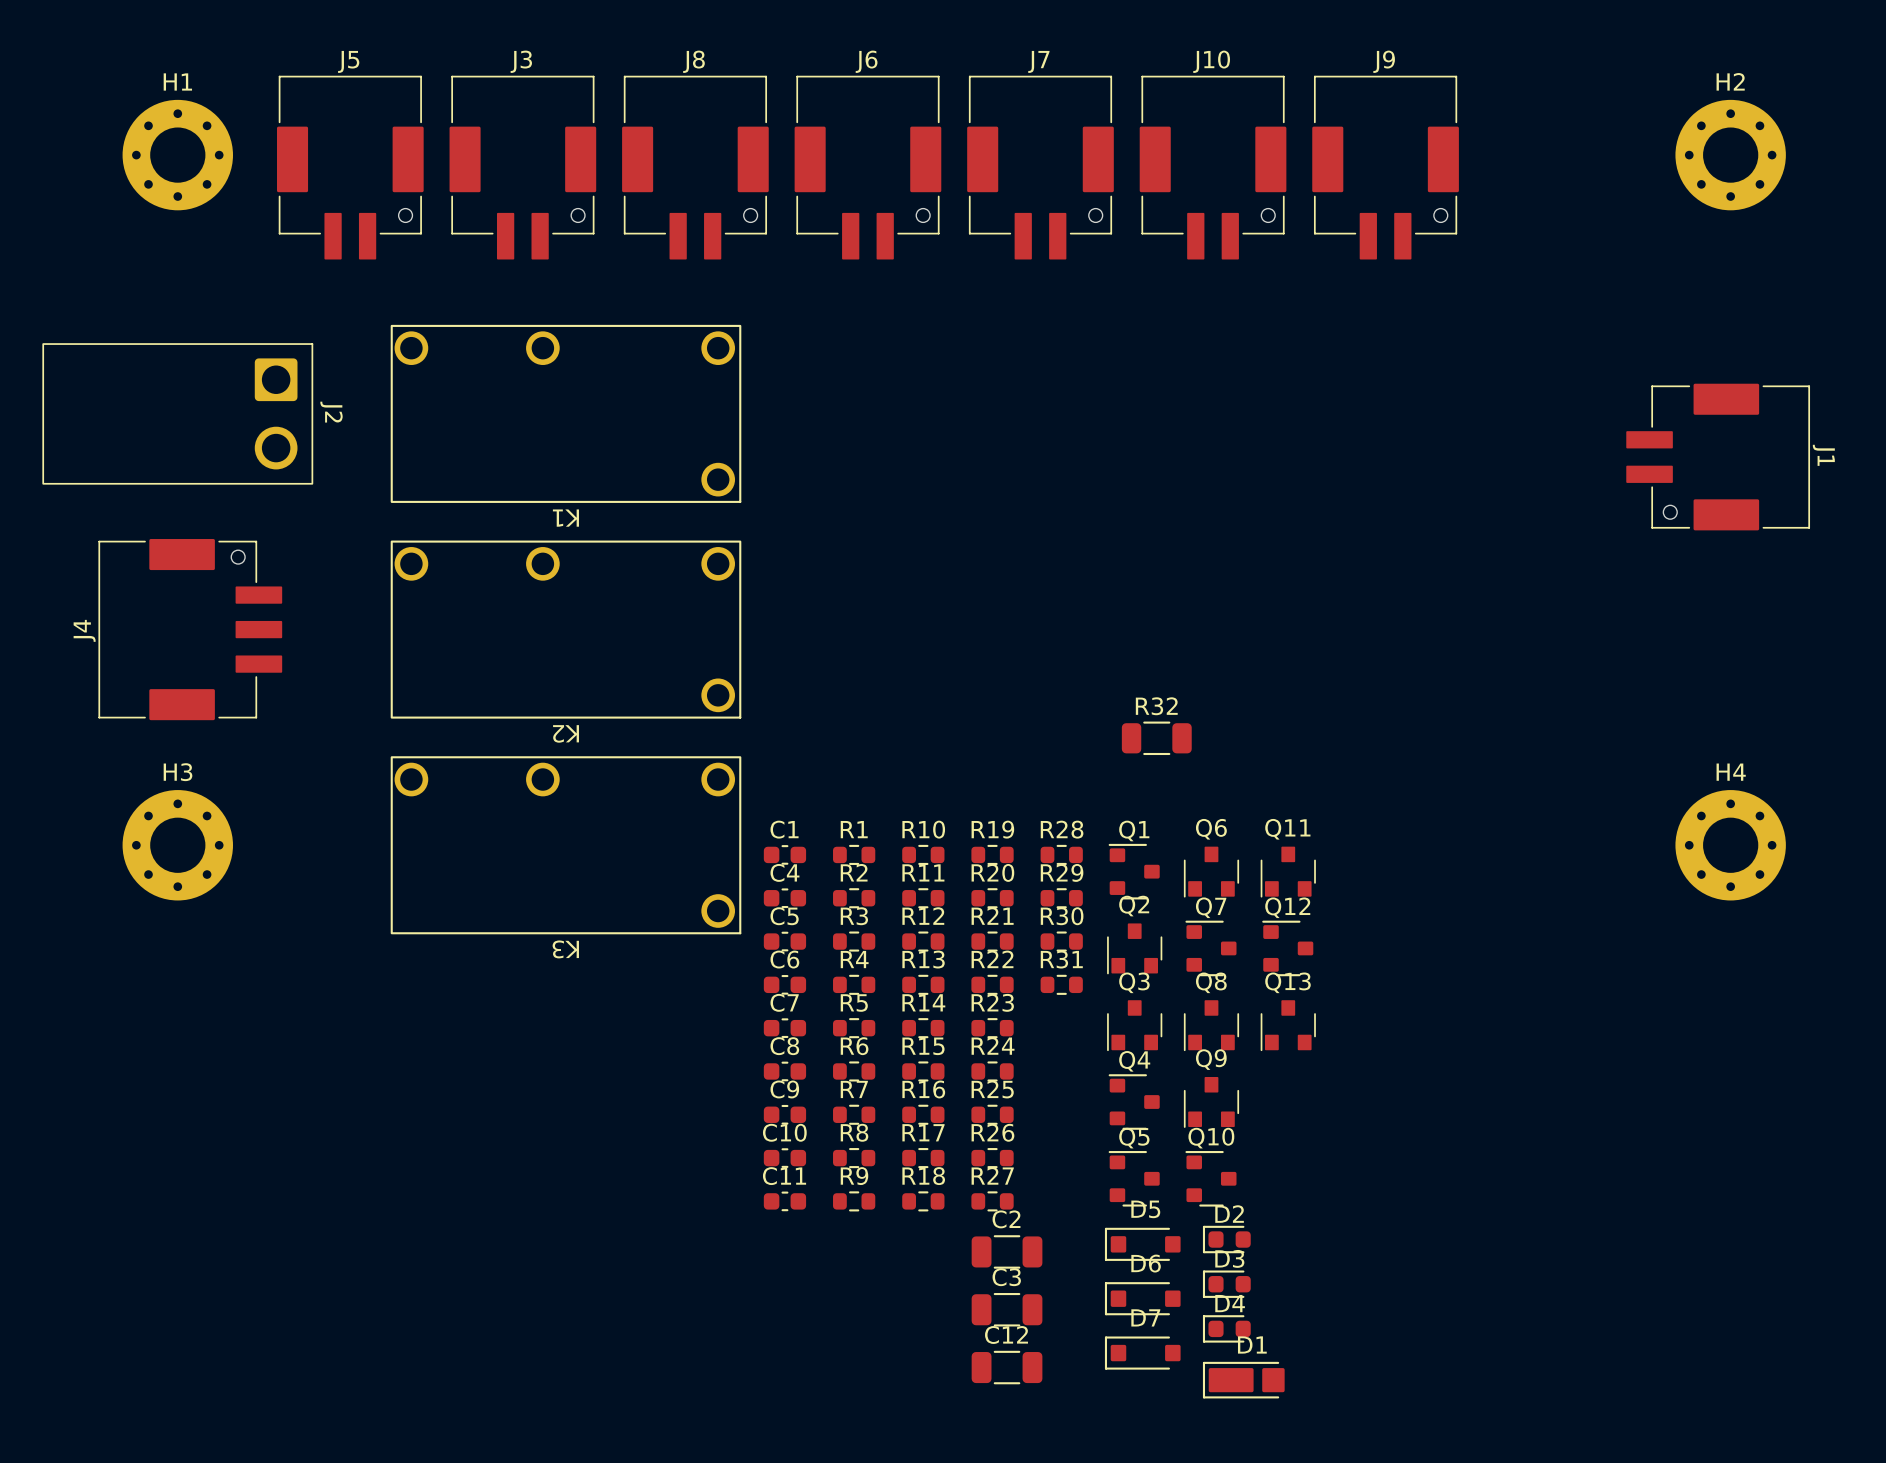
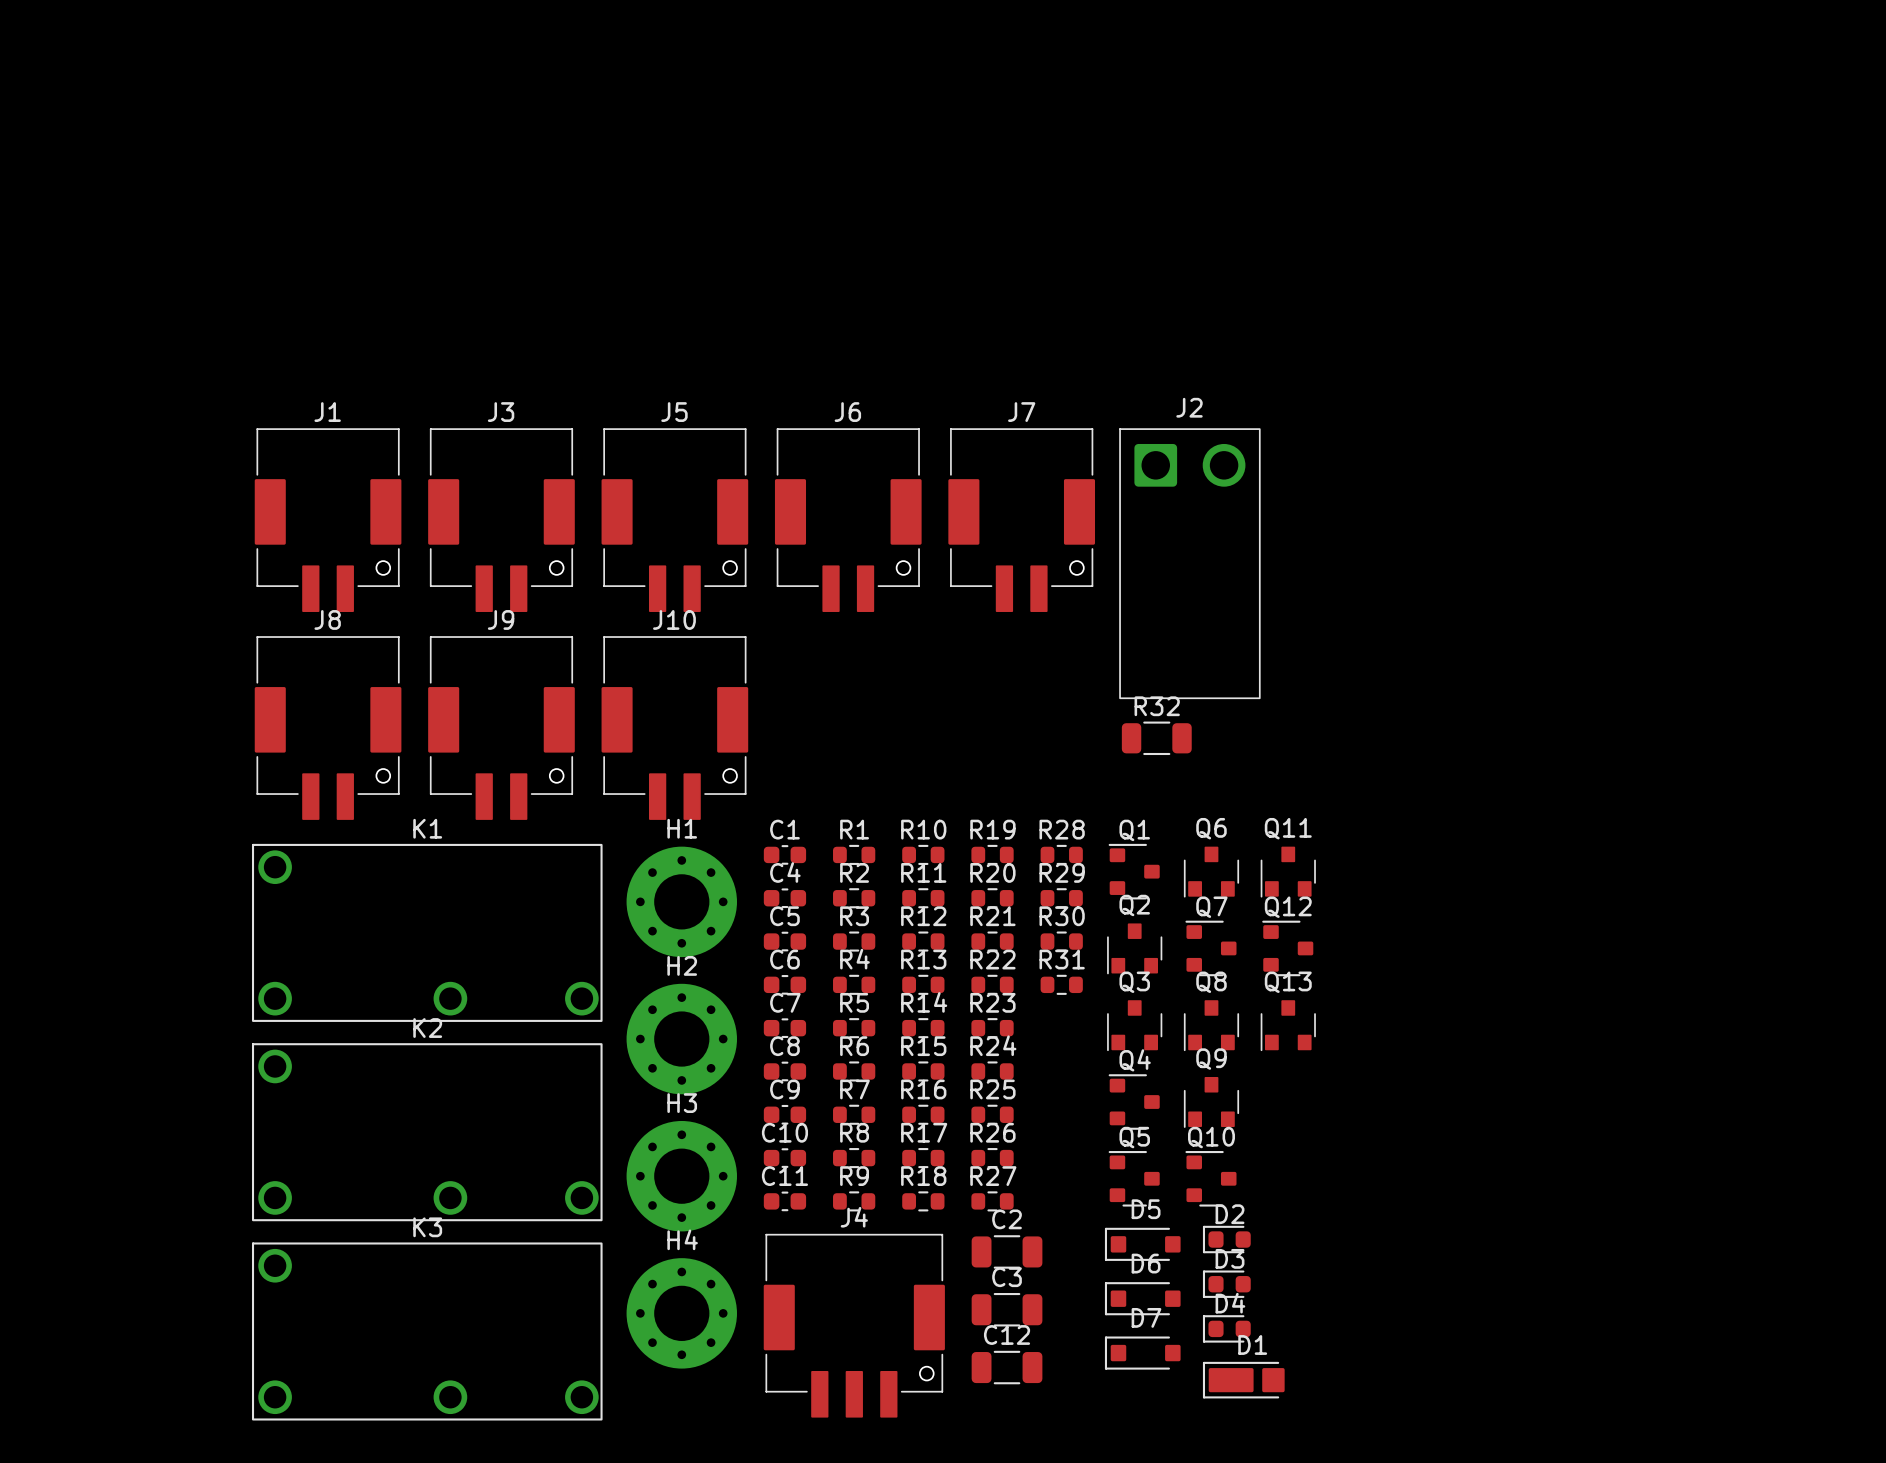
H1 position: (177, 155) -> (681, 901)
H2 position: (1730, 155) -> (681, 1039)
J5 position: (350, 167) -> (674, 520)
J3 position: (522, 167) -> (501, 520)
J8 position: (695, 167) -> (328, 728)
J6 position: (867, 167) -> (848, 520)
J7 position: (1040, 167) -> (1021, 520)
J10 position: (1213, 167) -> (674, 728)
J9 position: (1385, 167) -> (501, 728)
J2 rotation: 0° (177, 413) -> 90° counterclockwise (1189, 563)
J2 position: (177, 413) -> (1189, 563)
K1 rotation: 0° (566, 413) -> 180° (427, 932)
K1 position: (566, 413) -> (427, 932)
J1 rotation: 0° (1718, 457) -> 90° counterclockwise (328, 520)
J1 position: (1718, 457) -> (328, 520)
J4 rotation: 0° (190, 629) -> 90° clockwise (854, 1325)
J4 position: (190, 629) -> (854, 1325)
K2 rotation: 0° (566, 629) -> 180° (427, 1132)
K2 position: (566, 629) -> (427, 1132)
H3 position: (177, 845) -> (681, 1176)
K3 rotation: 0° (566, 845) -> 180° (427, 1331)
K3 position: (566, 845) -> (427, 1331)
H4 position: (1730, 845) -> (681, 1313)

